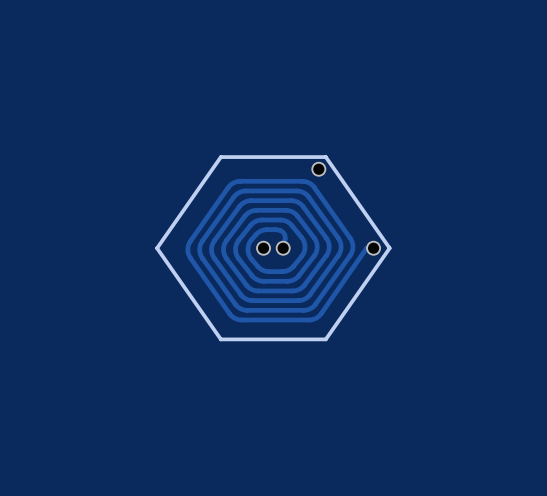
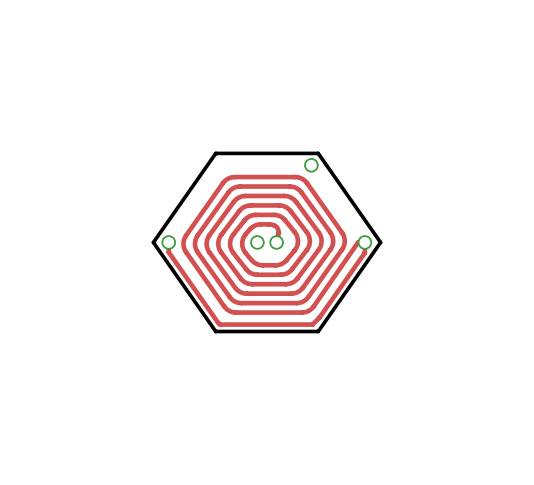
track: none -> (168, 242) (168, 252) (219, 324) (312, 324) (364, 252) (364, 242)
via: none -> (168, 242)

